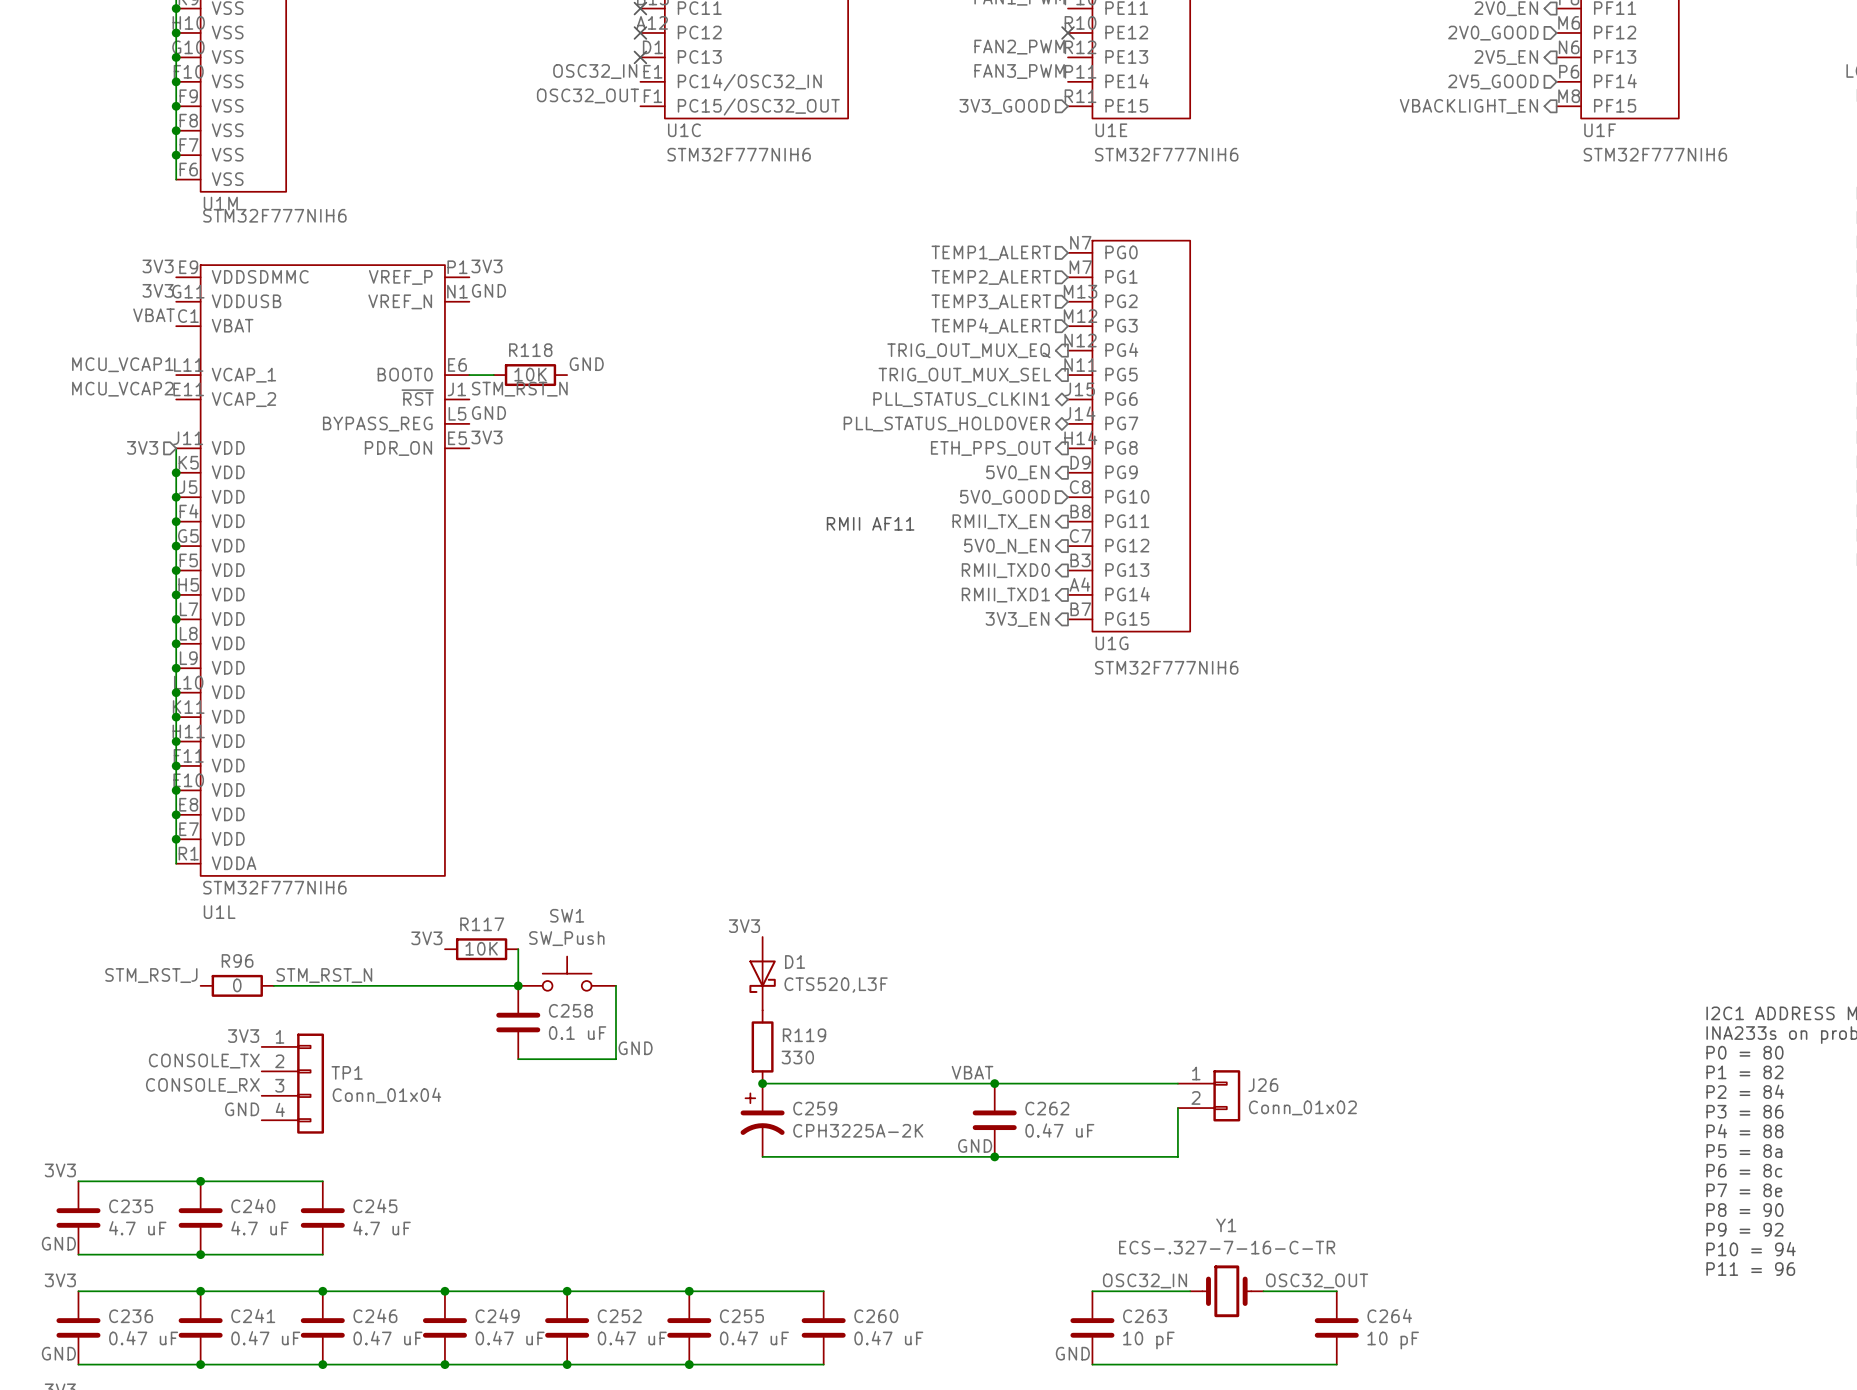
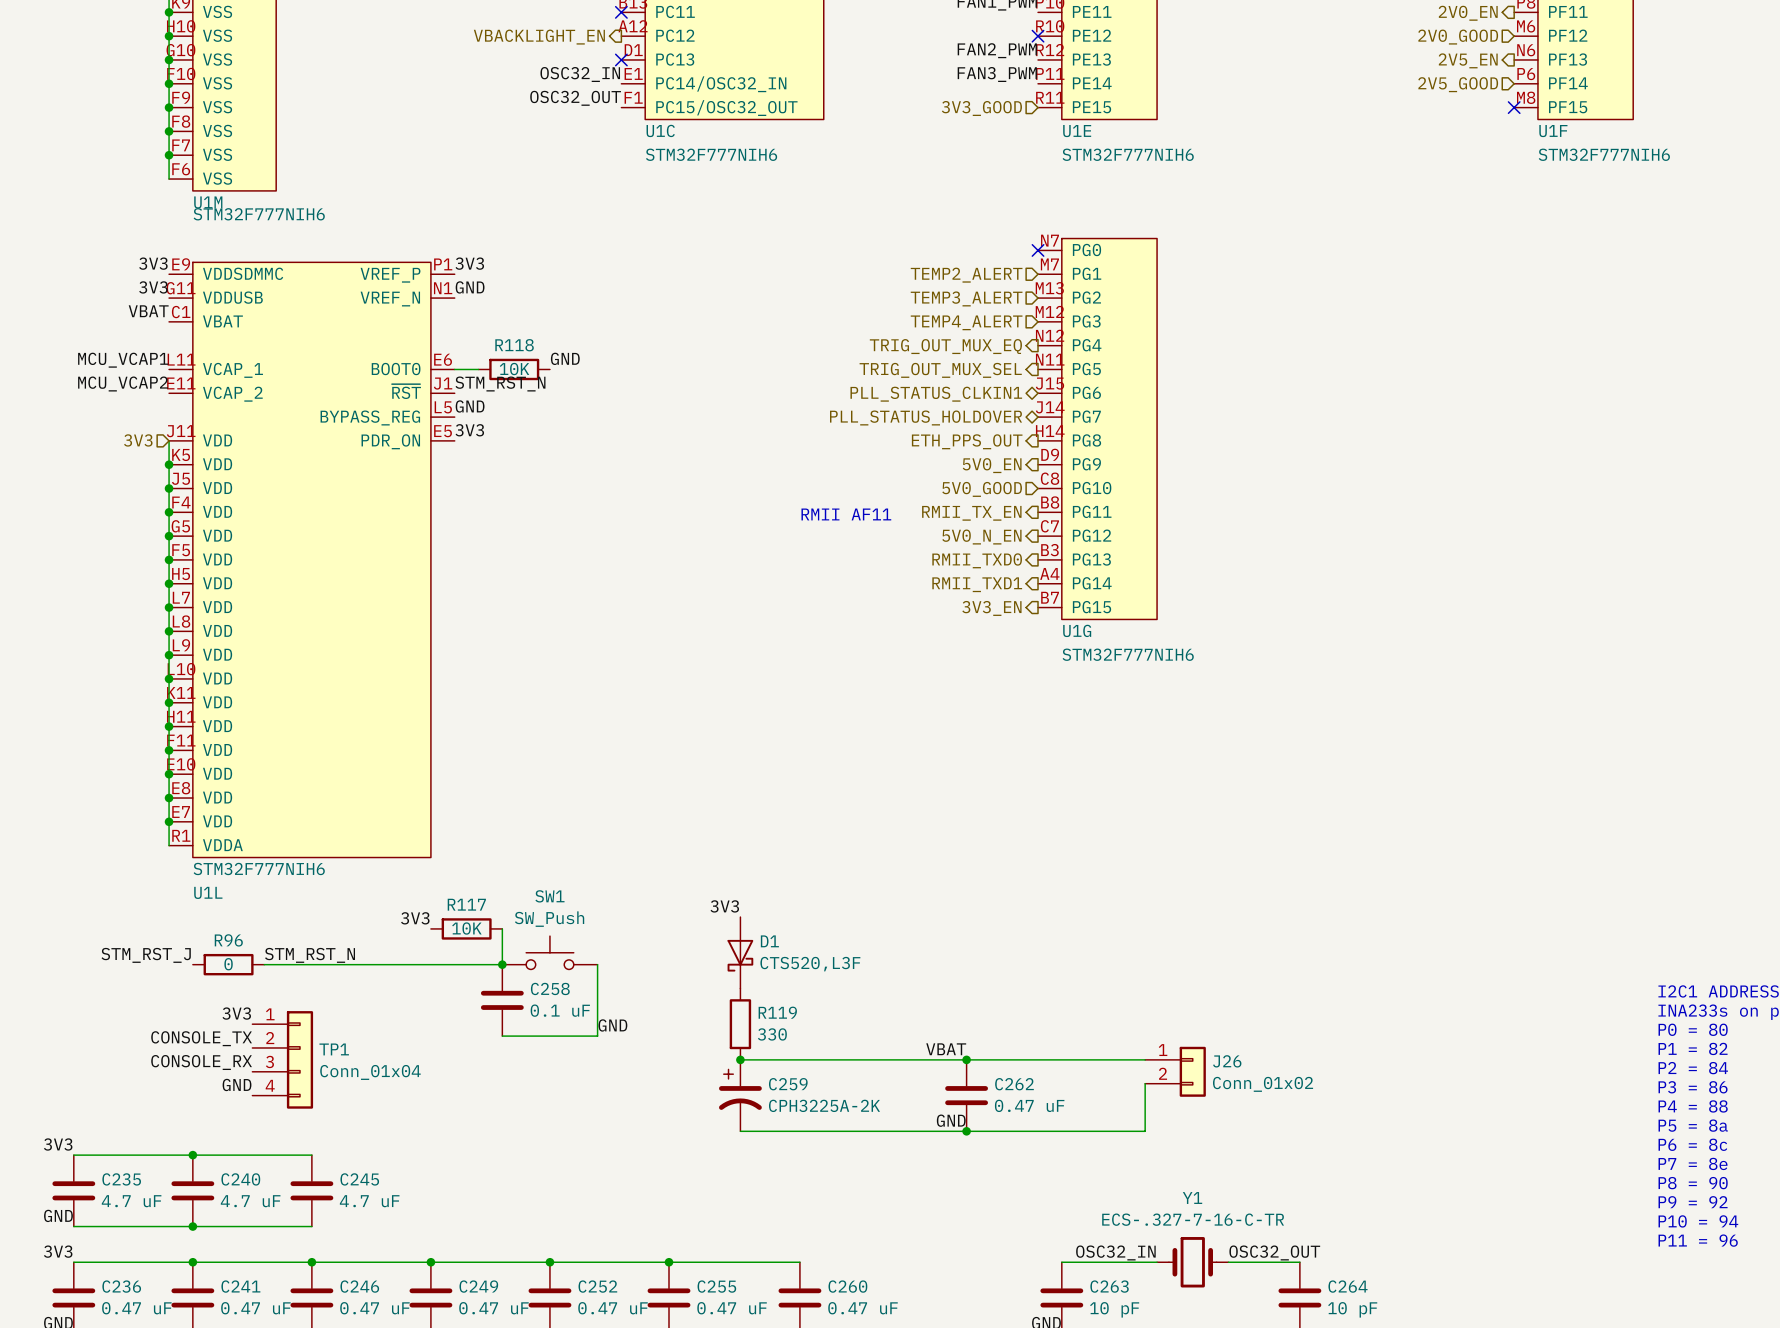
no-connect mark: (640, 32) -> none
hierarchical label: none -> VBACKLIGHT_EN (539, 37)
hierarchical label: VBACKLIGHT_EN (1468, 106) -> none
no-connect mark: none -> (1514, 107)
no-connect mark: none -> (1038, 250)
hierarchical label: TEMP1_ALERT (991, 253) -> none

